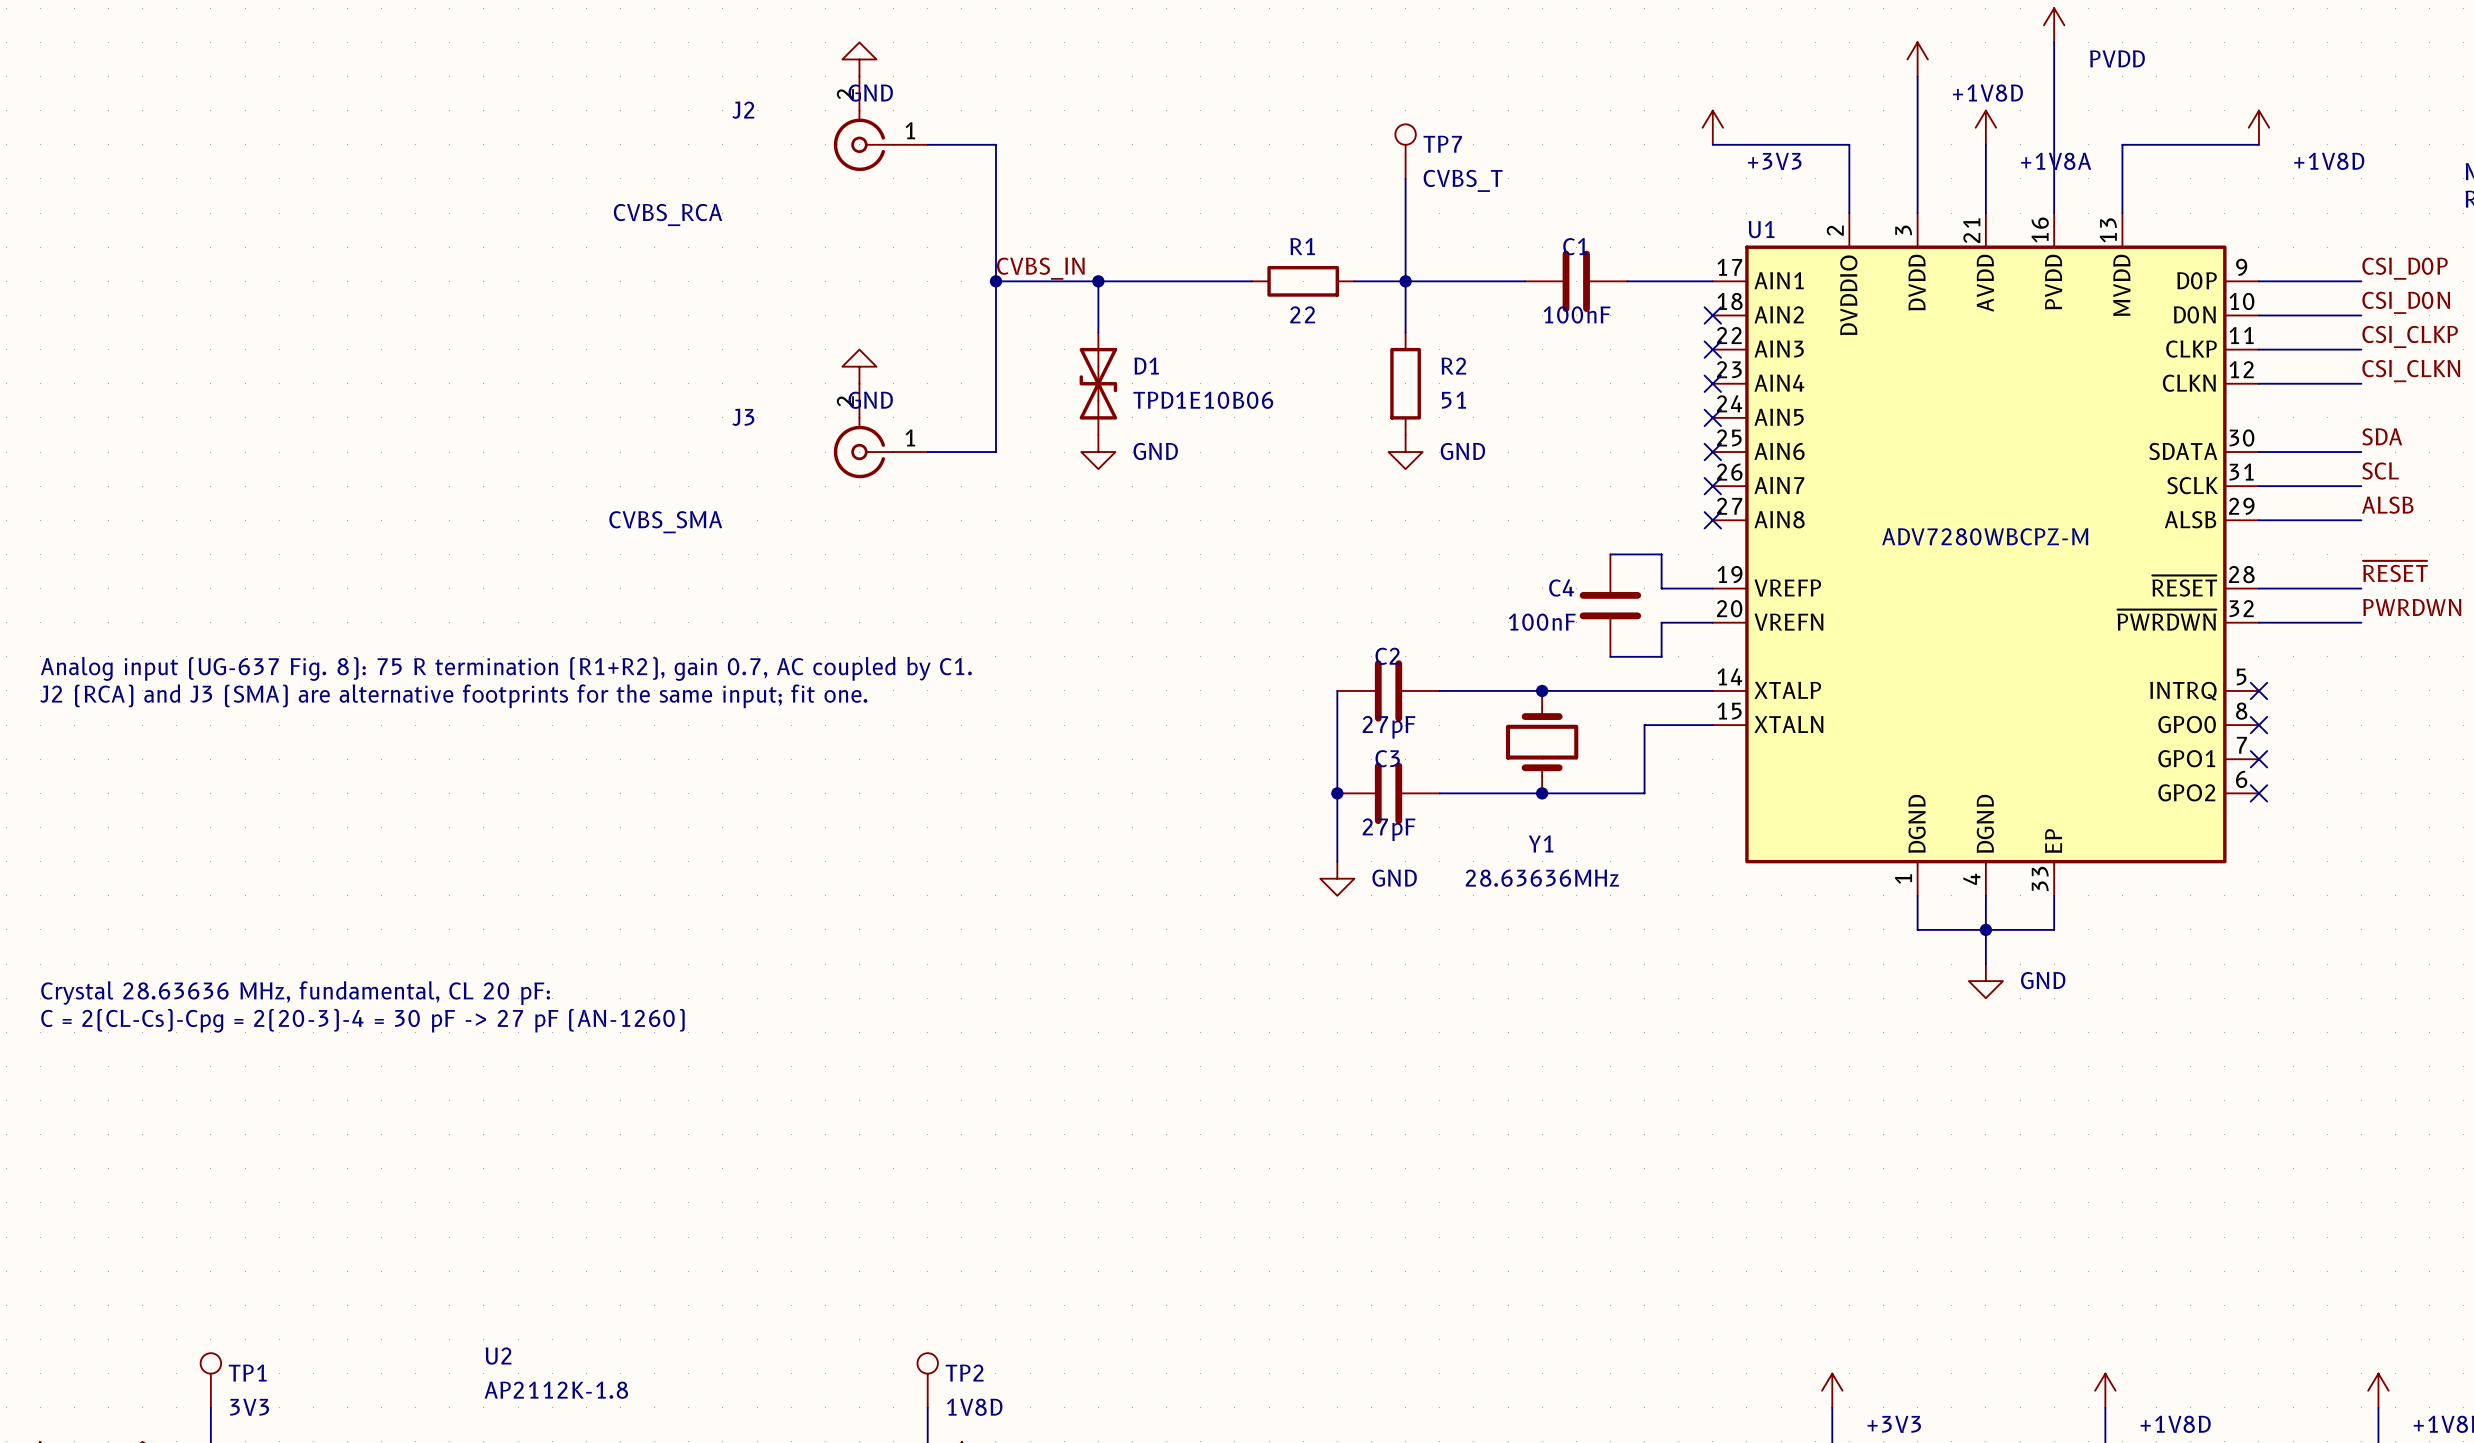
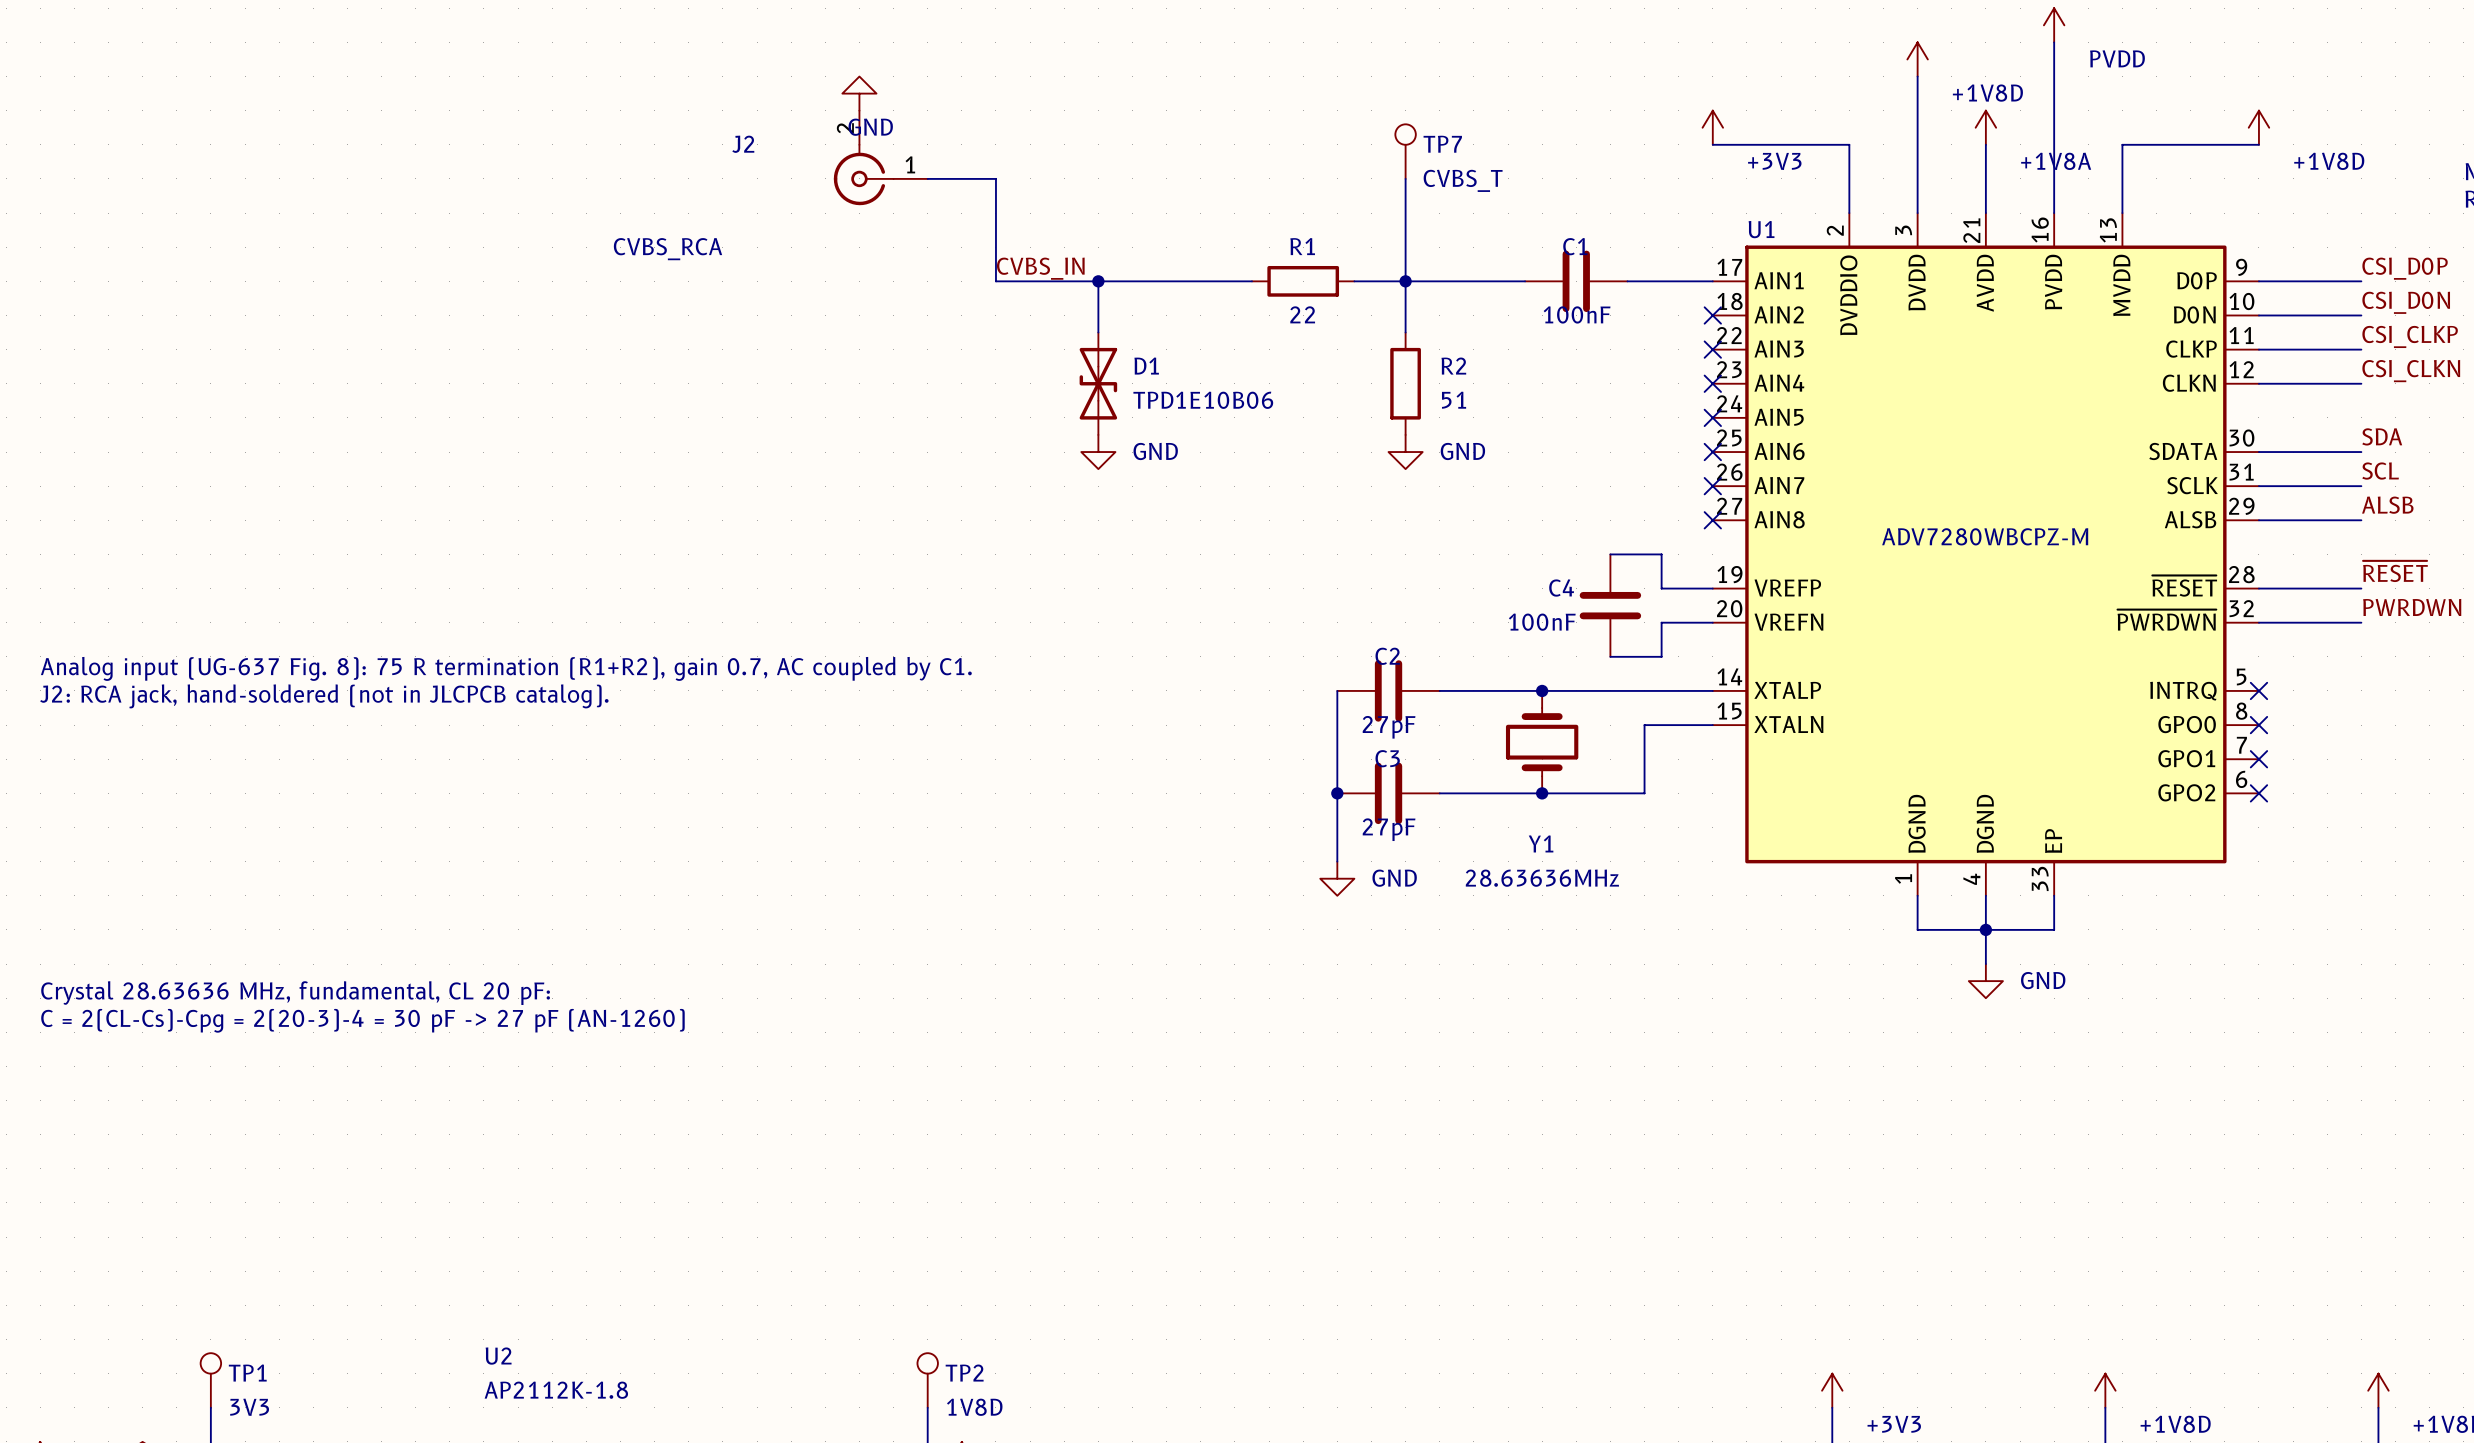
power symbol position: GND (859, 59) -> GND (859, 93)
J2 position: (880, 123) -> (880, 157)
wire: (927, 144) (995, 144) (995, 178) -> (927, 178) (995, 178)
wire: (995, 281) (995, 452) (927, 452) -> none
junction: (995, 281) -> none
power symbol: GND (859, 366) -> none
J3: CVBS_SMA (880, 431) -> none
text: J2 (RCA) and J3 (SMA) are alternative footprints for the same input; fit one. (453, 696) -> J2: RCA jack, hand-soldered (not in JLCPCB catalog). (324, 696)

